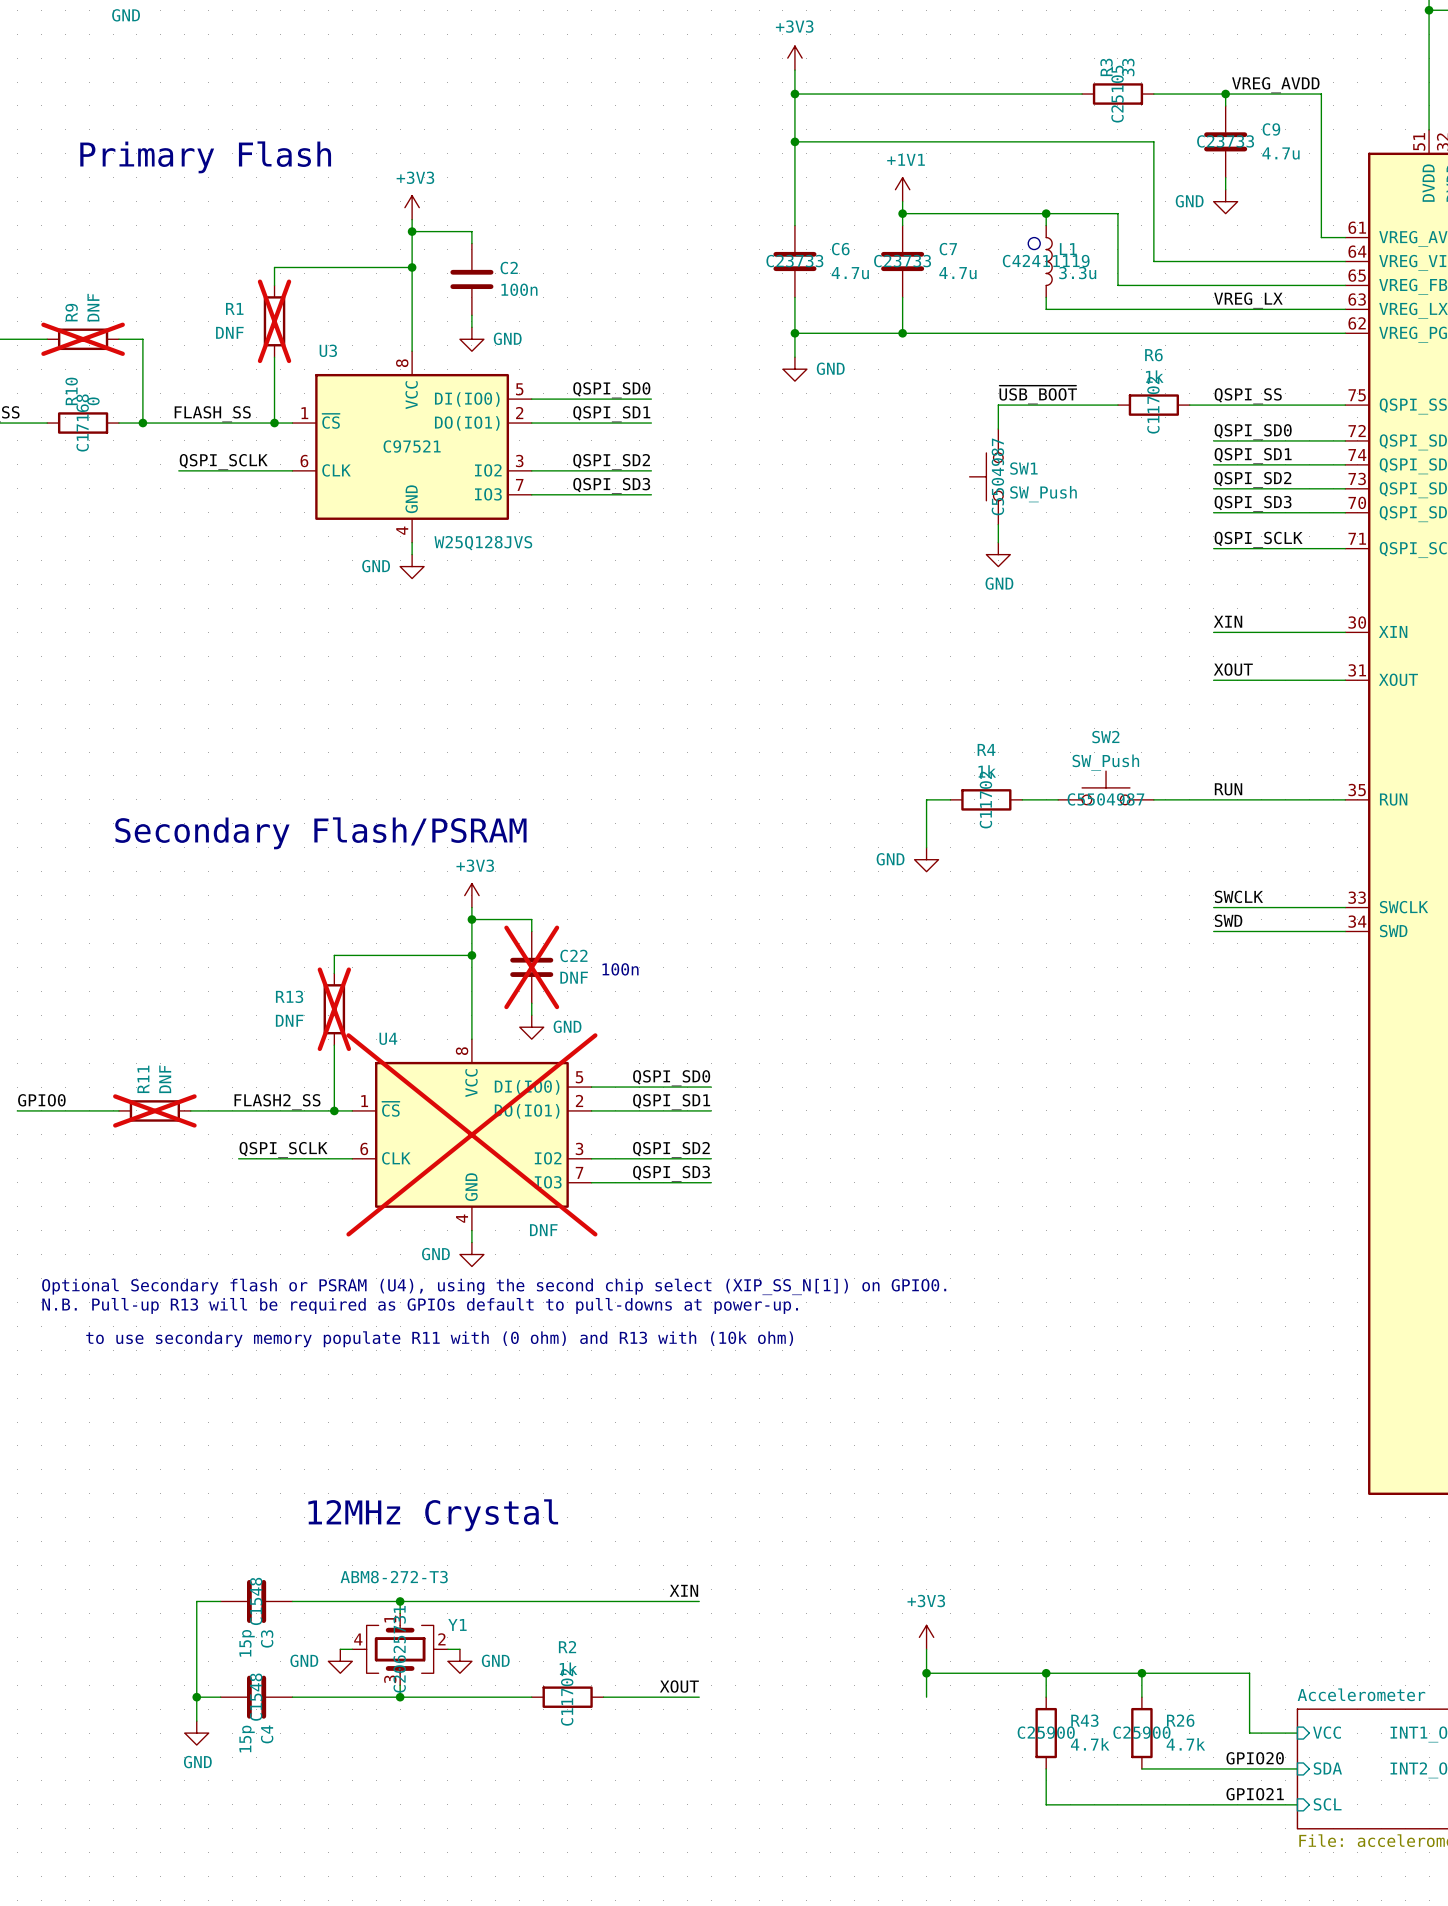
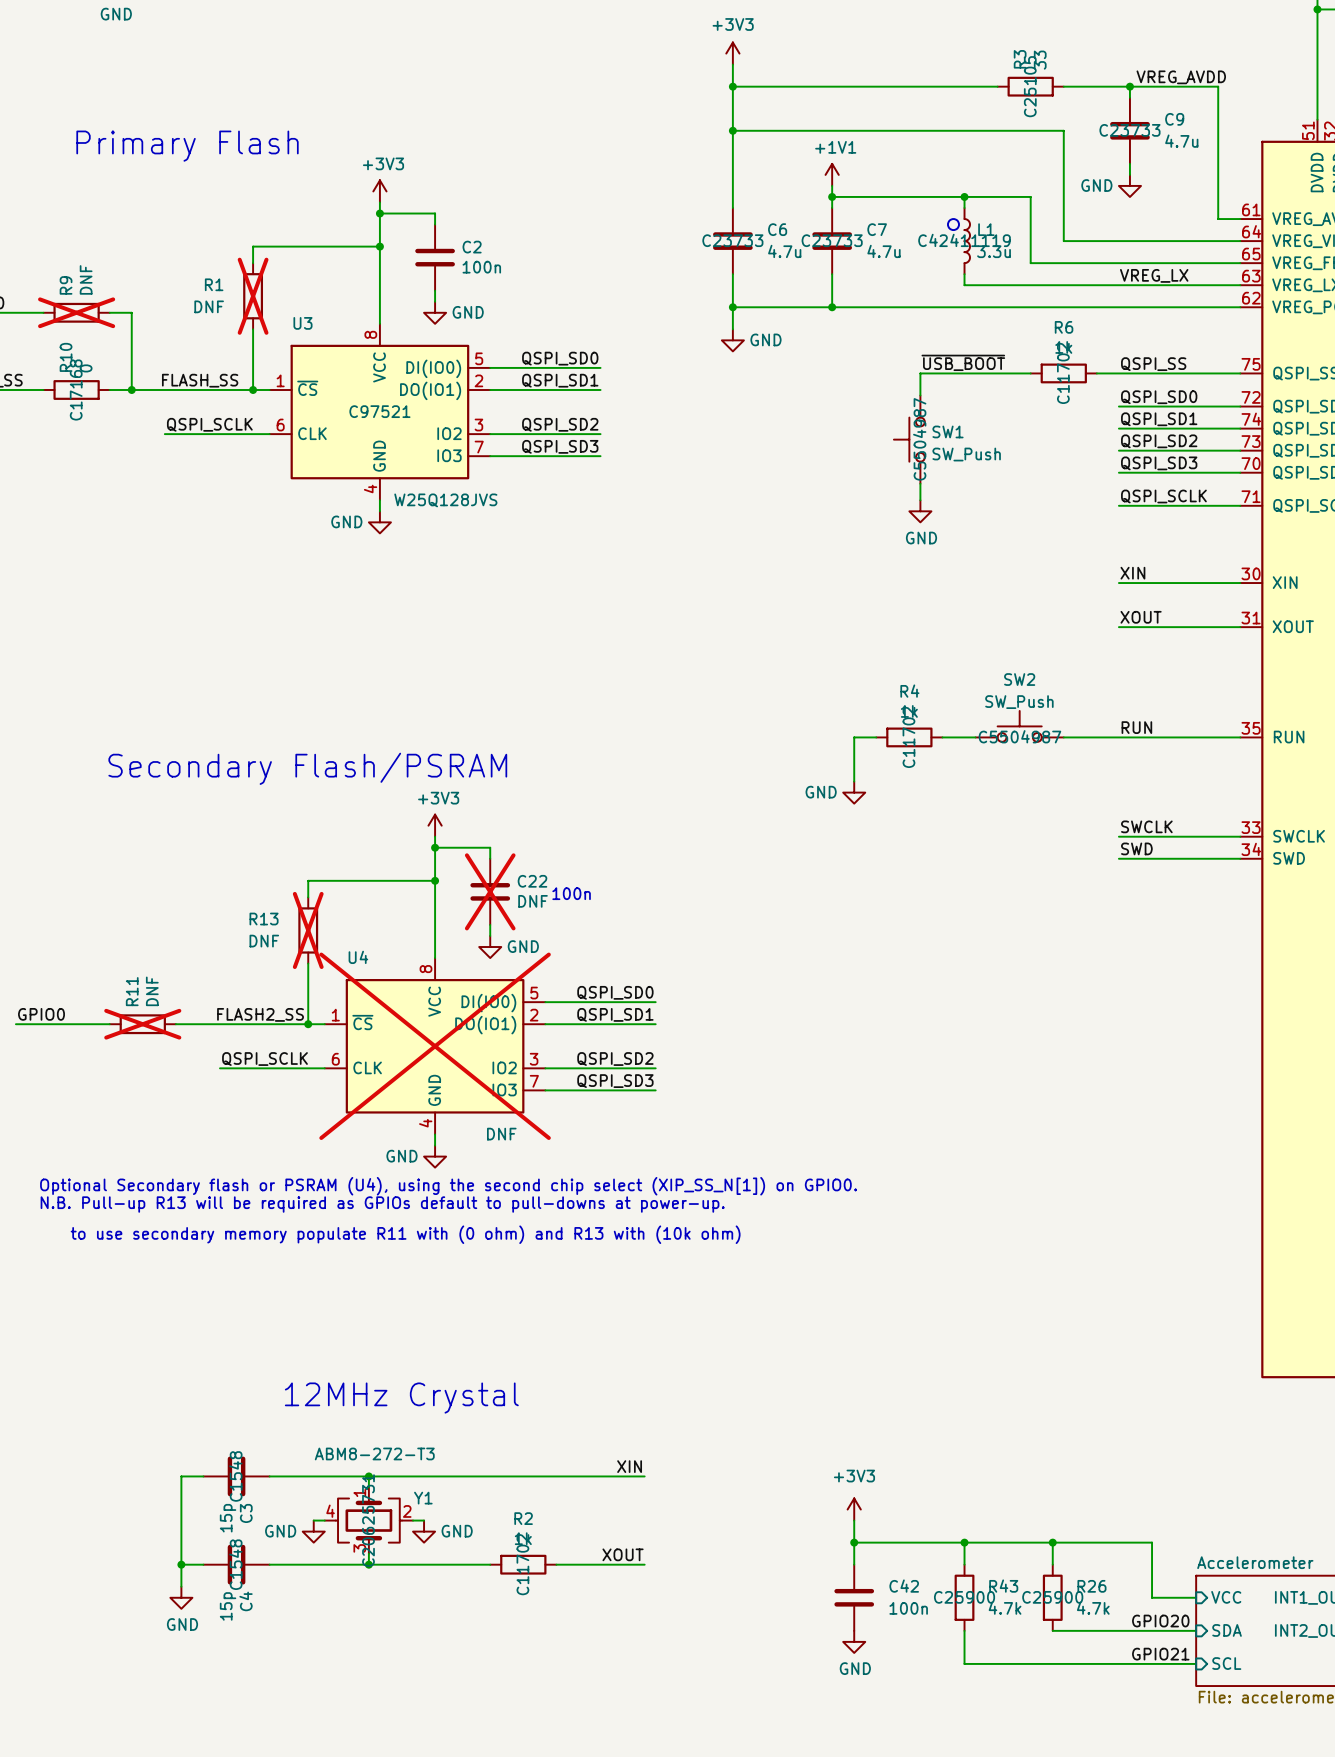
C42: none -> 100n (854, 1597)
power symbol: none -> GND (854, 1641)

